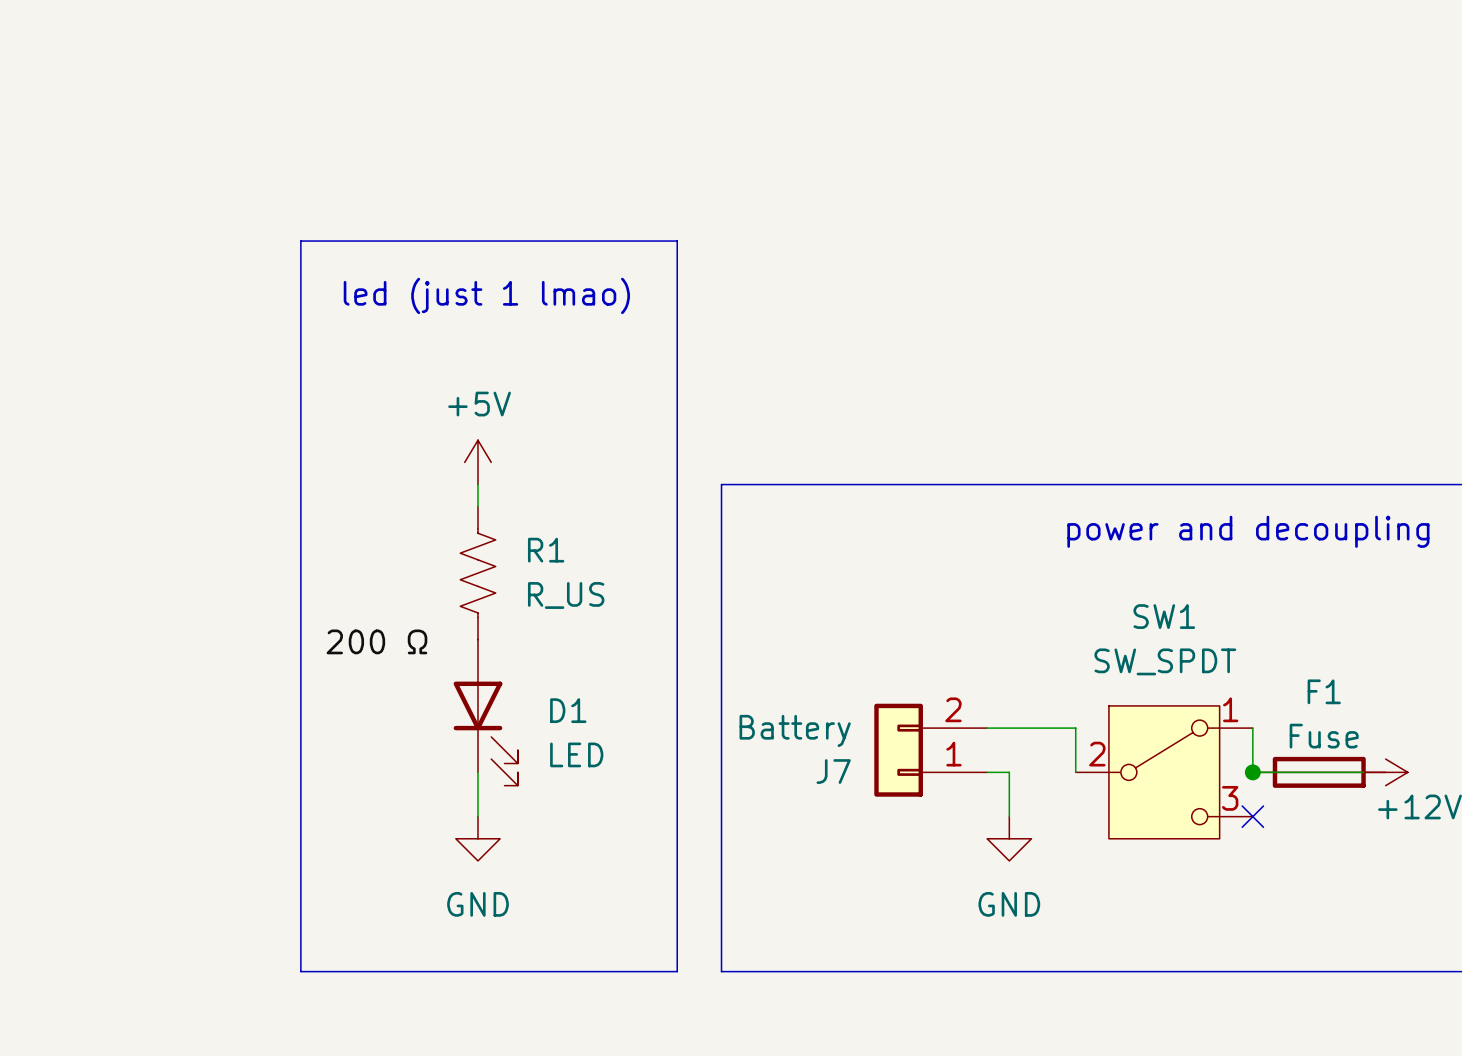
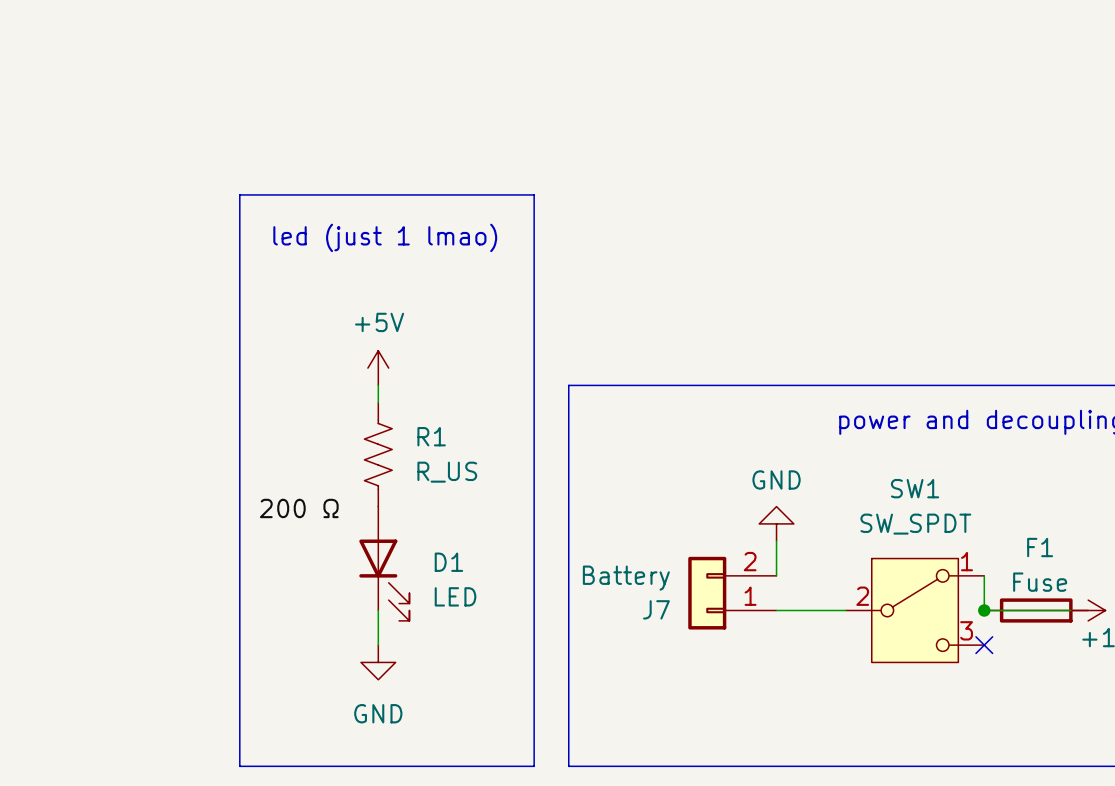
wire: (987, 728) (1075, 728) (1075, 772) -> (793, 610) (845, 610)
wire: (1009, 772) (1009, 816) -> (776, 541) (776, 575)
power symbol rotation: 0° (1009, 838) -> 180° (776, 523)
power symbol position: GND (1009, 838) -> GND (776, 523)

